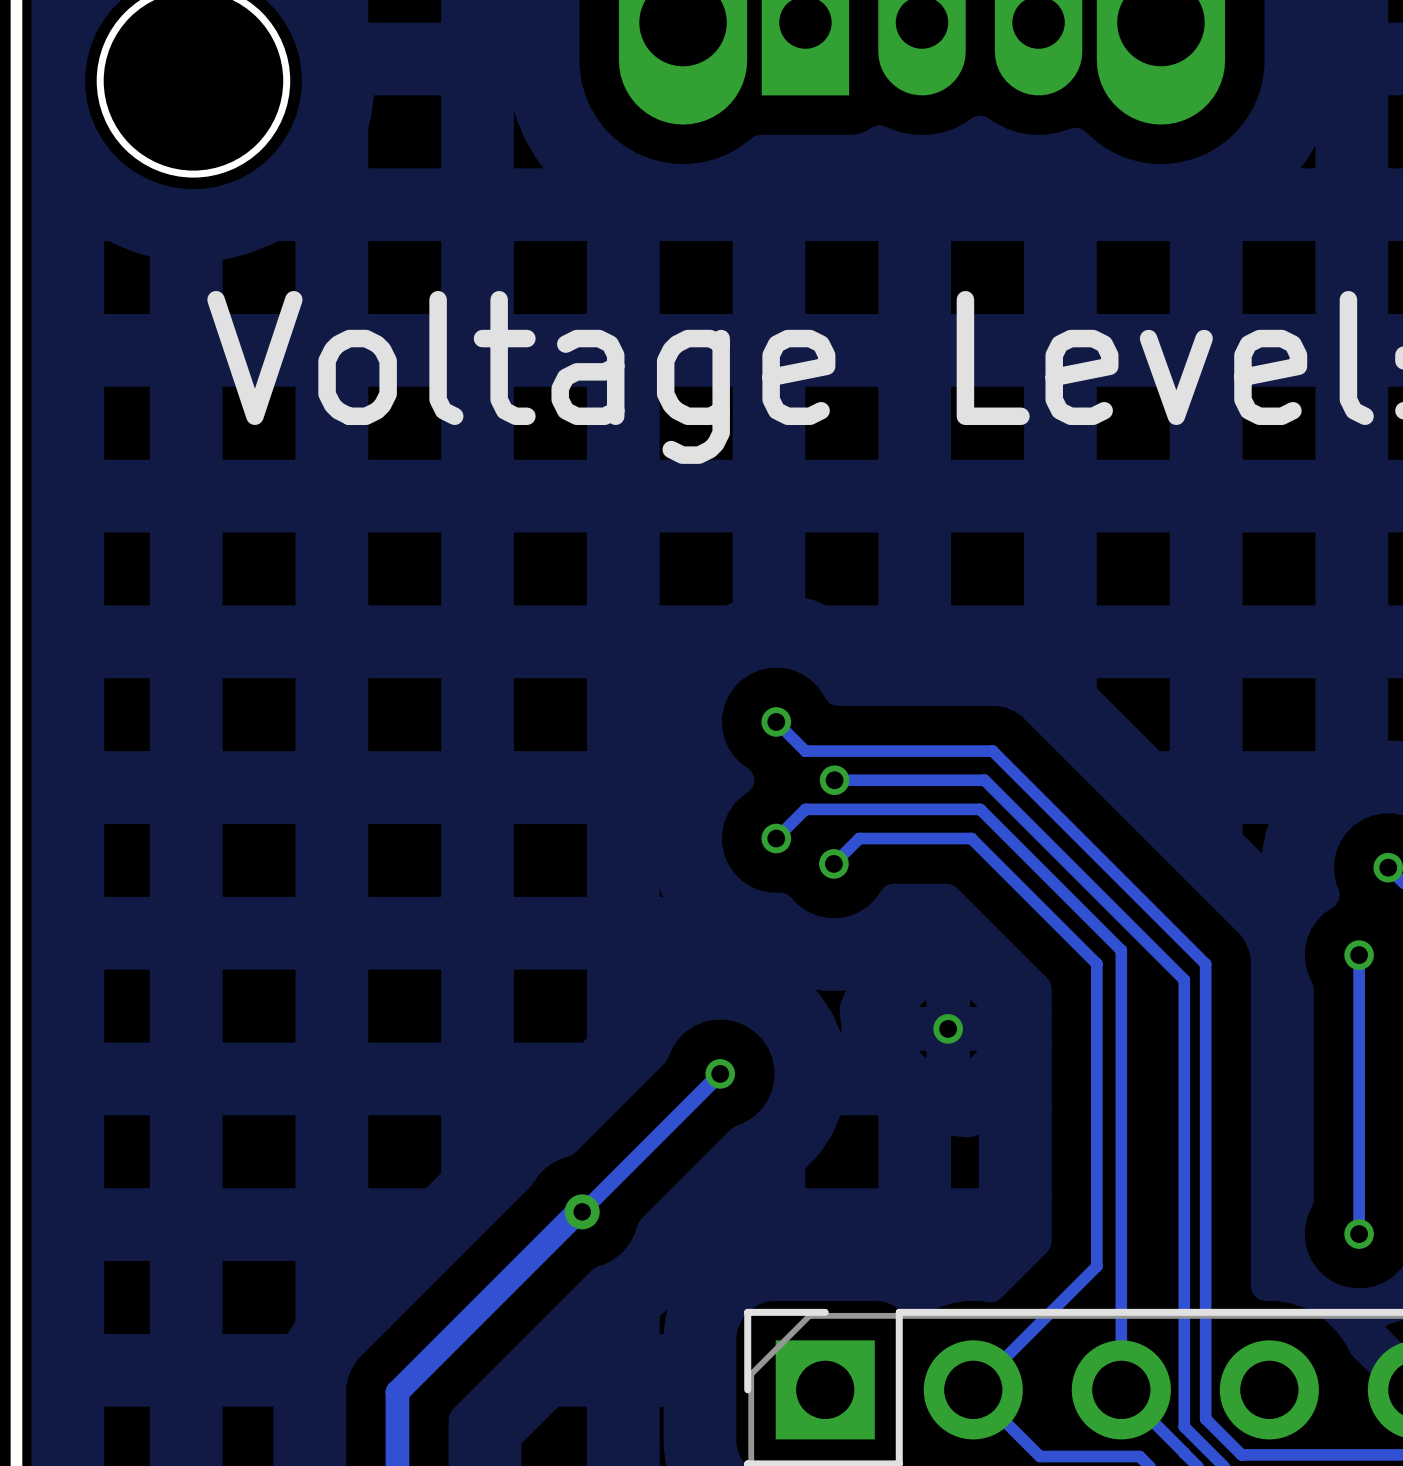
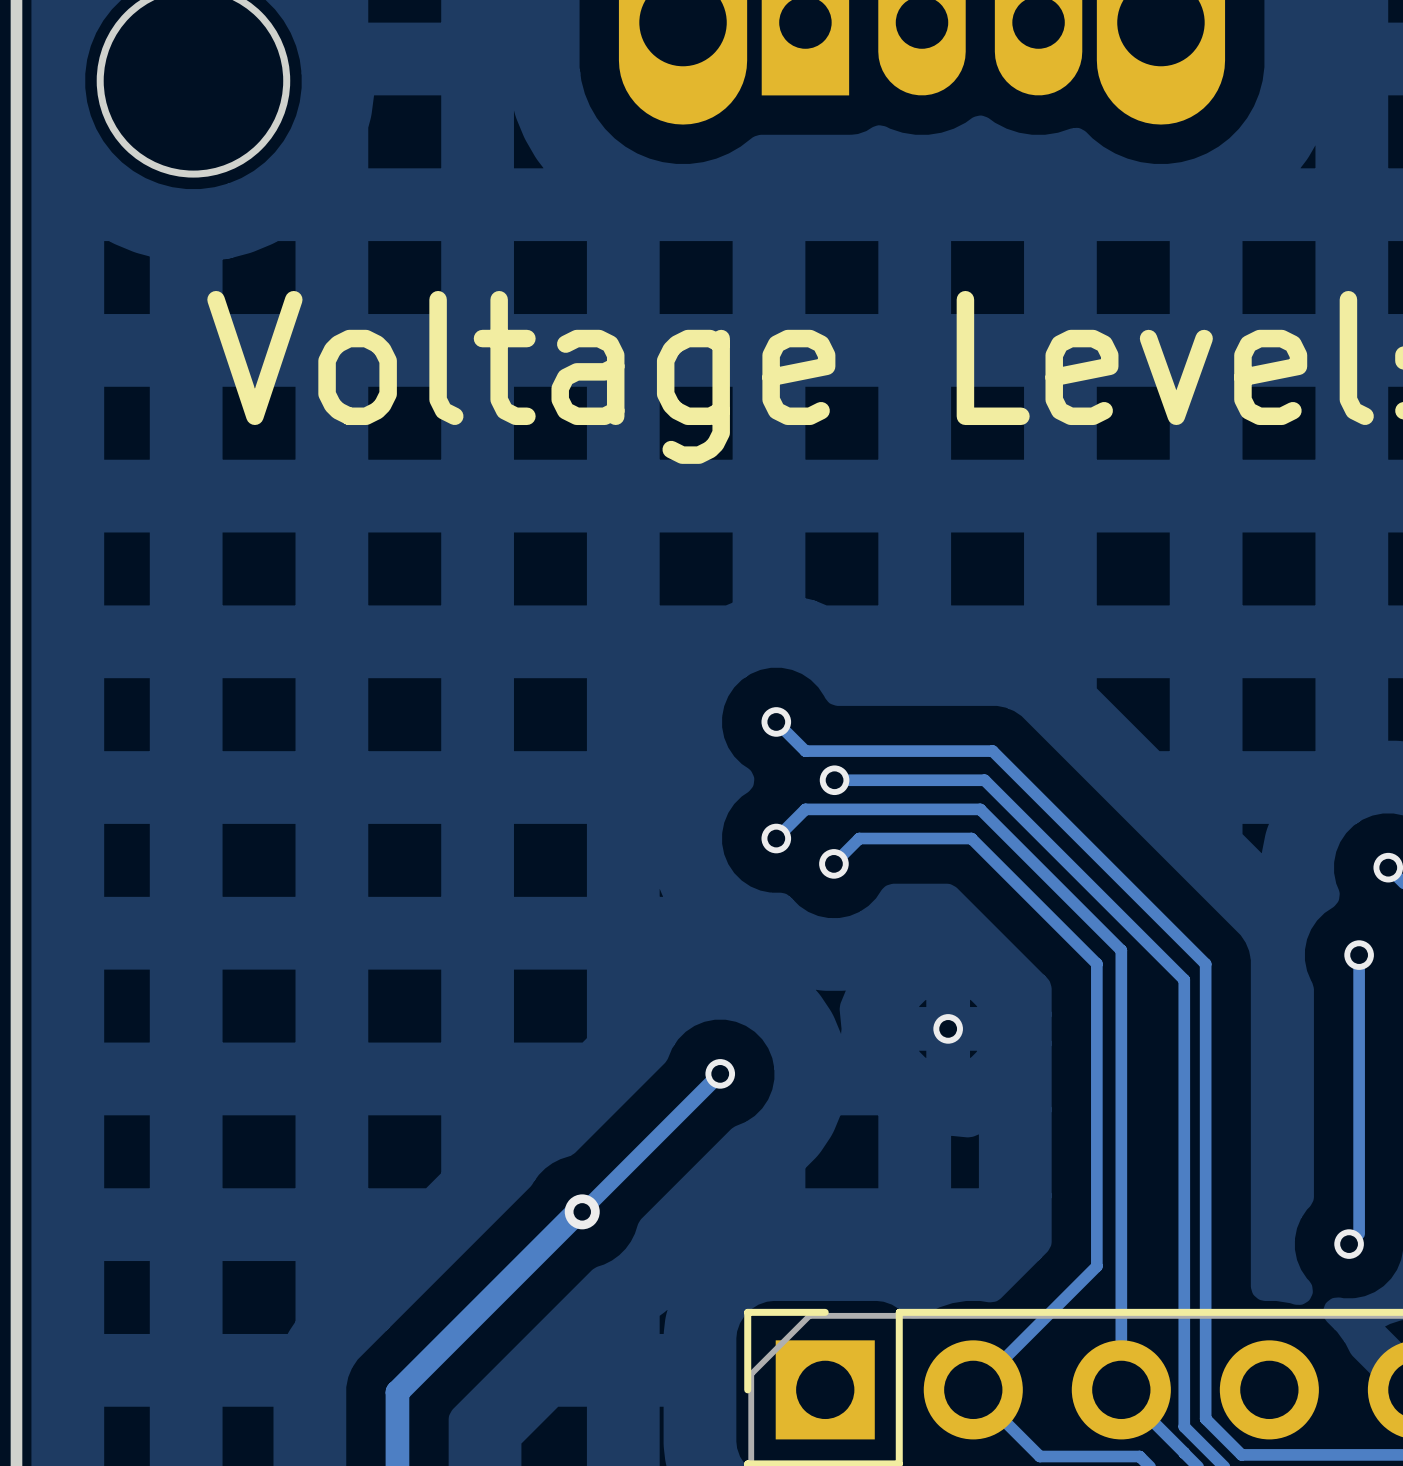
via position: (1359, 1234) -> (1349, 1244)

